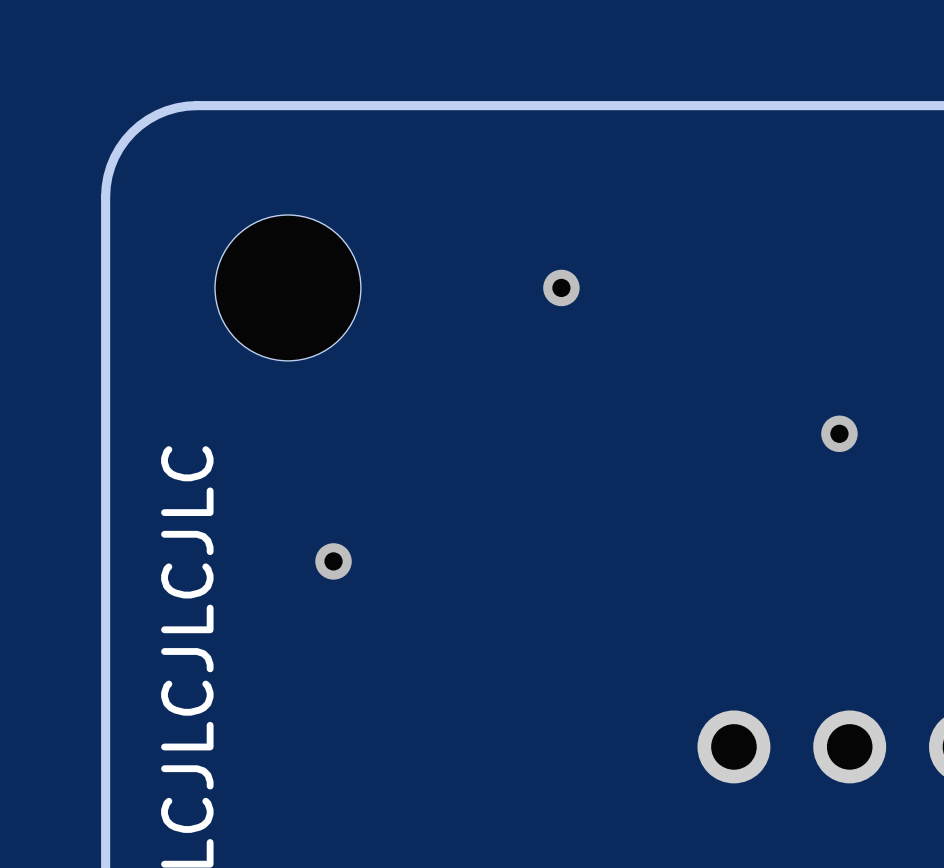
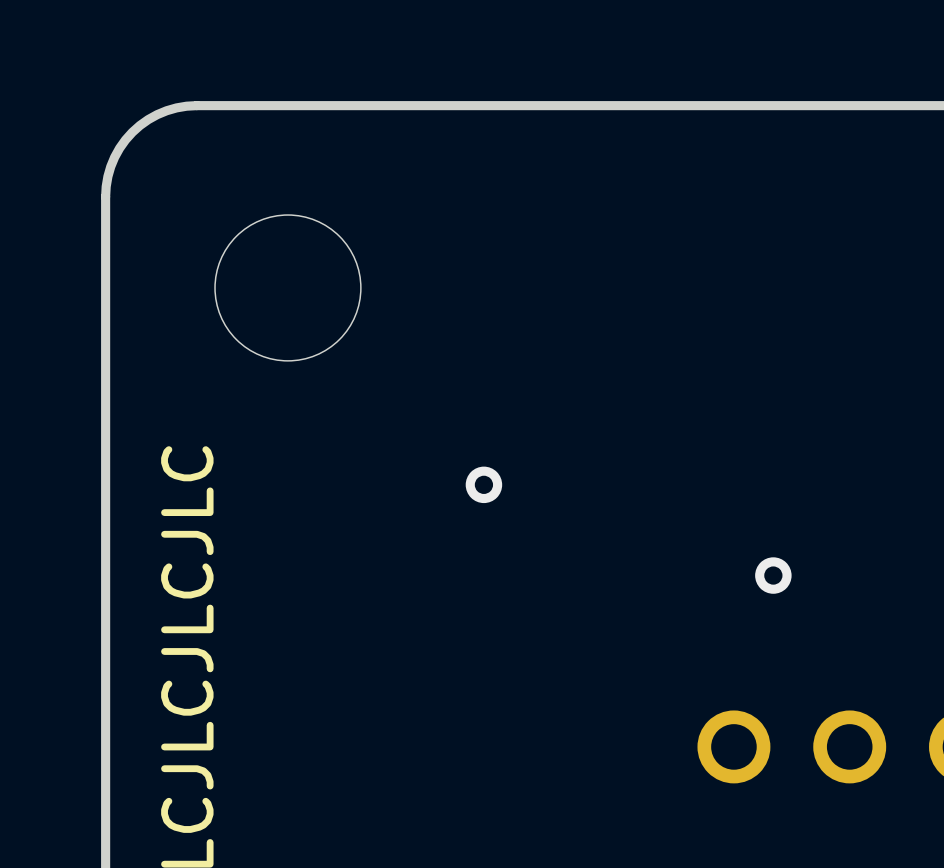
via: (561, 287) -> none
via position: (839, 433) -> (773, 575)
via: none -> (483, 484)
via: (333, 561) -> none

